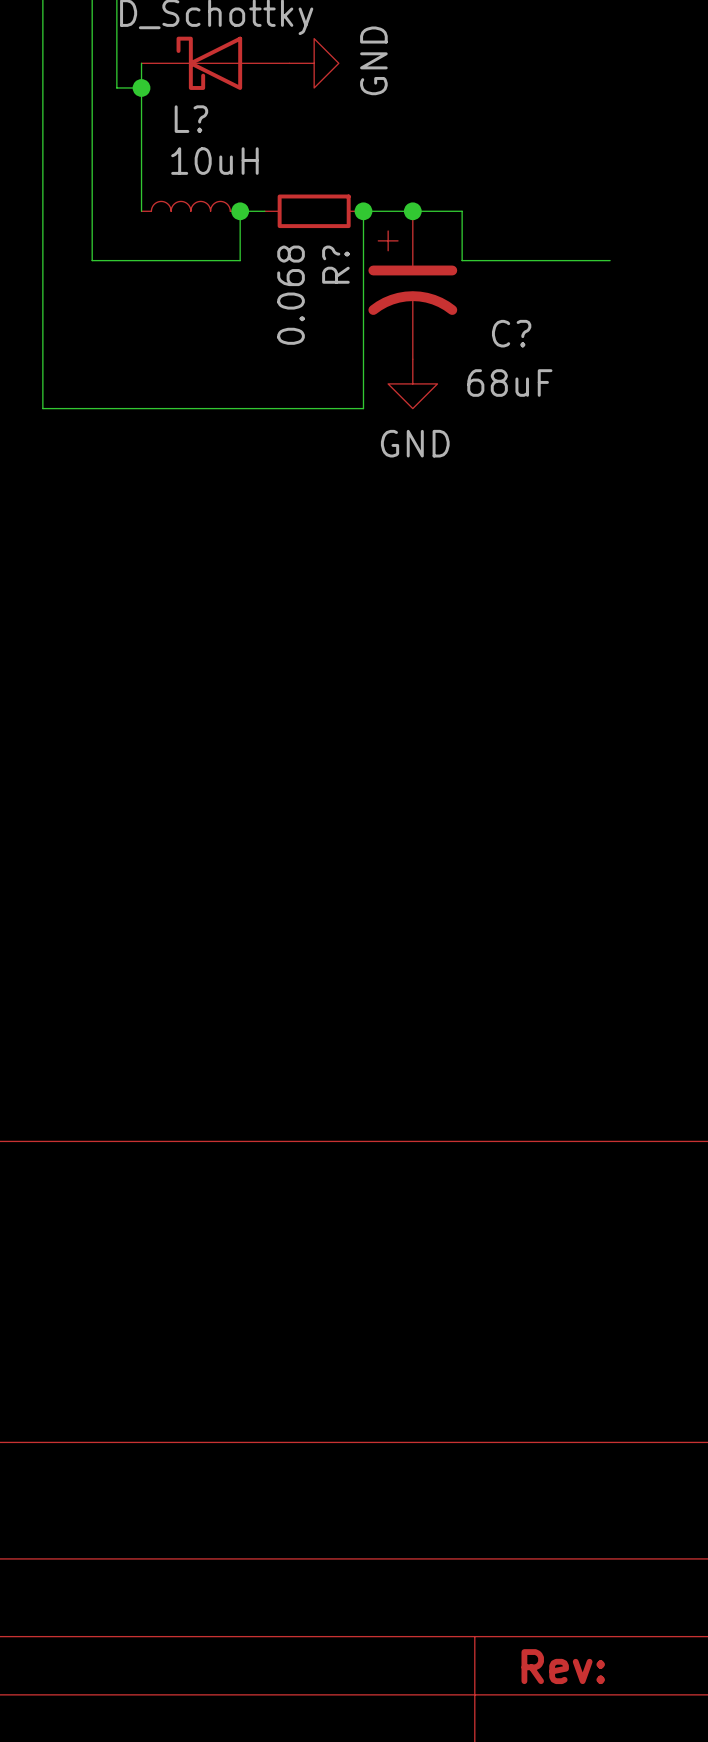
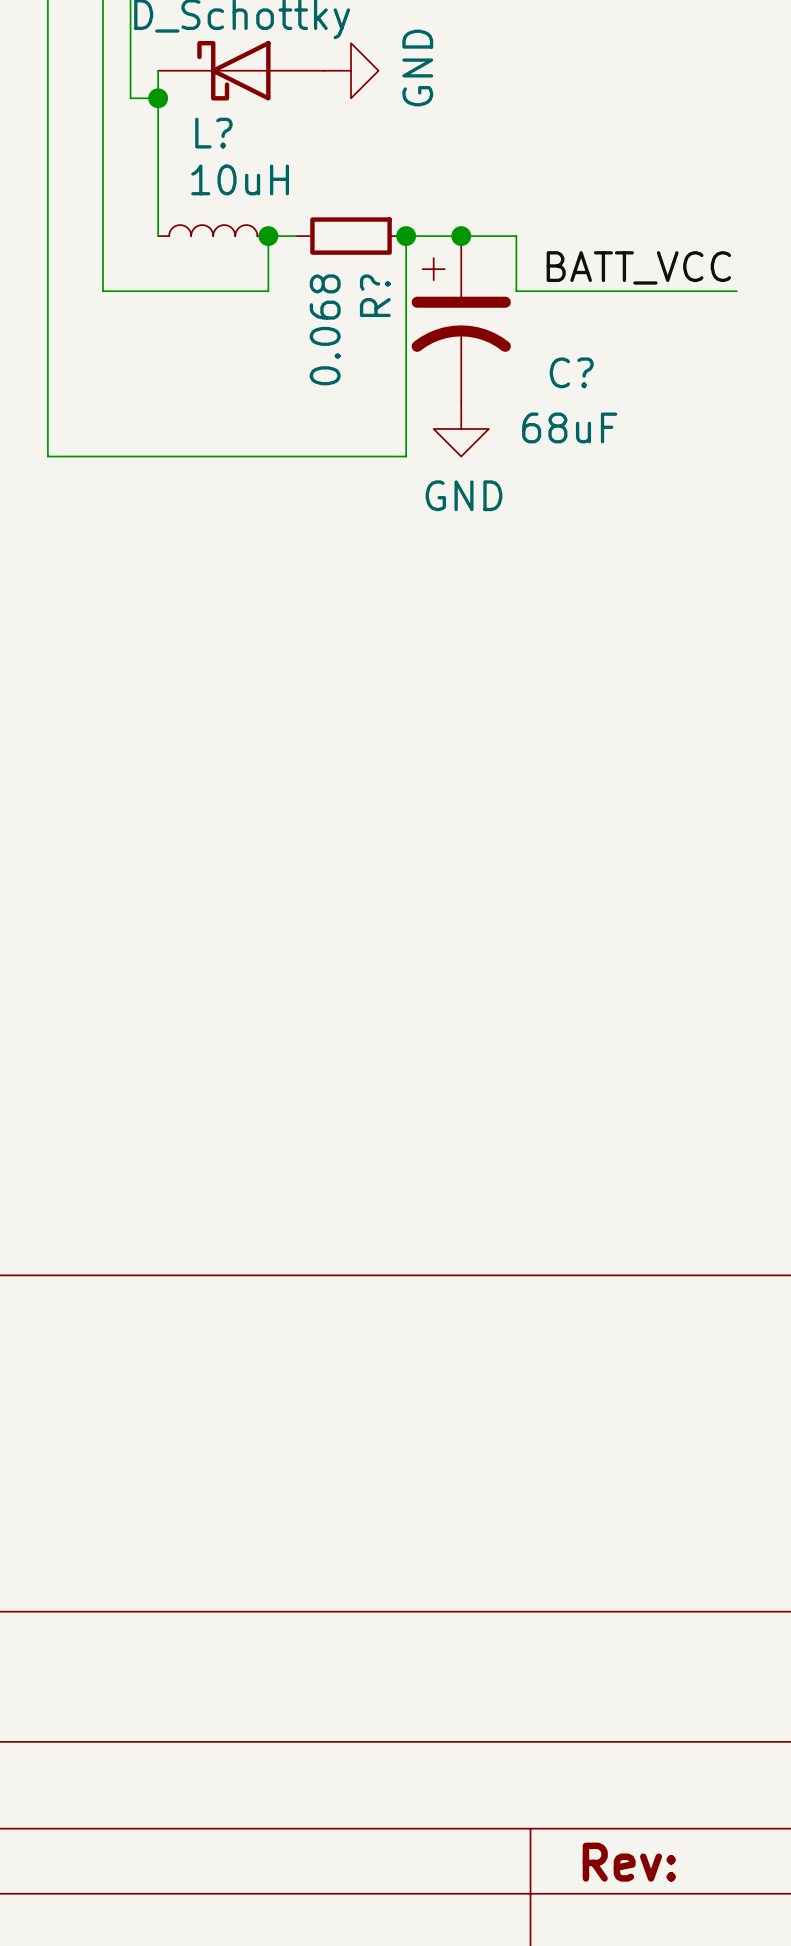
label: none -> BATT_VCC (638, 267)
wire: none -> (681, 291) (736, 291)

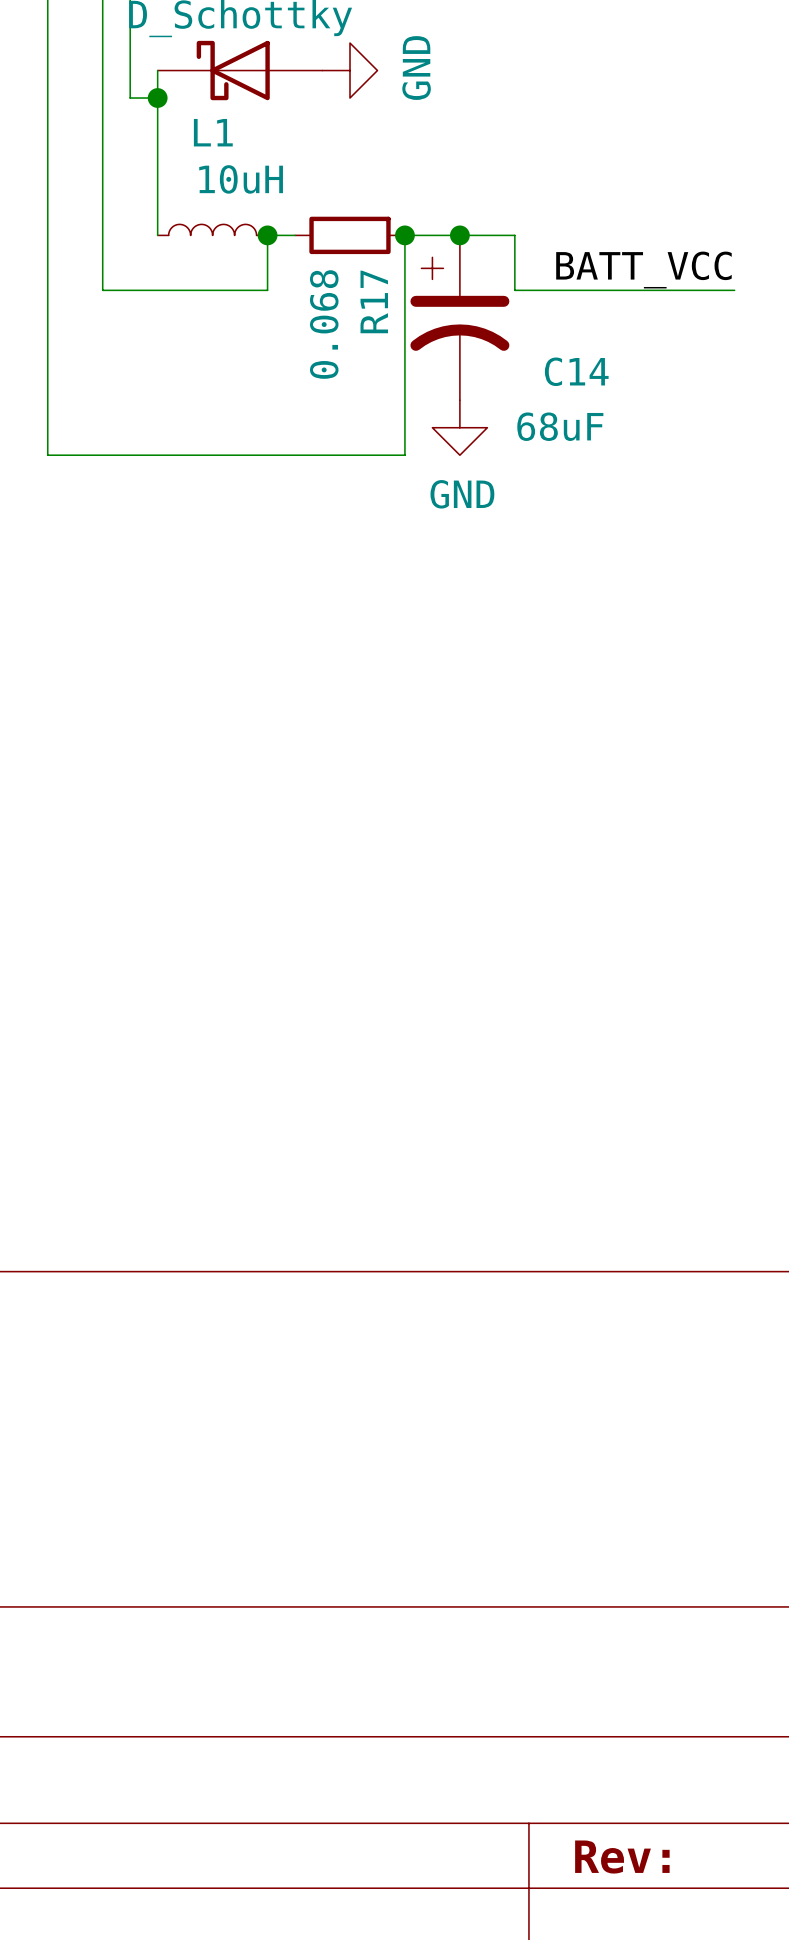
L? name: L? (213, 133) -> L1 (213, 132)
R? name: R? (375, 295) -> R17 (374, 301)
C? name: C? (571, 372) -> C14 (576, 371)

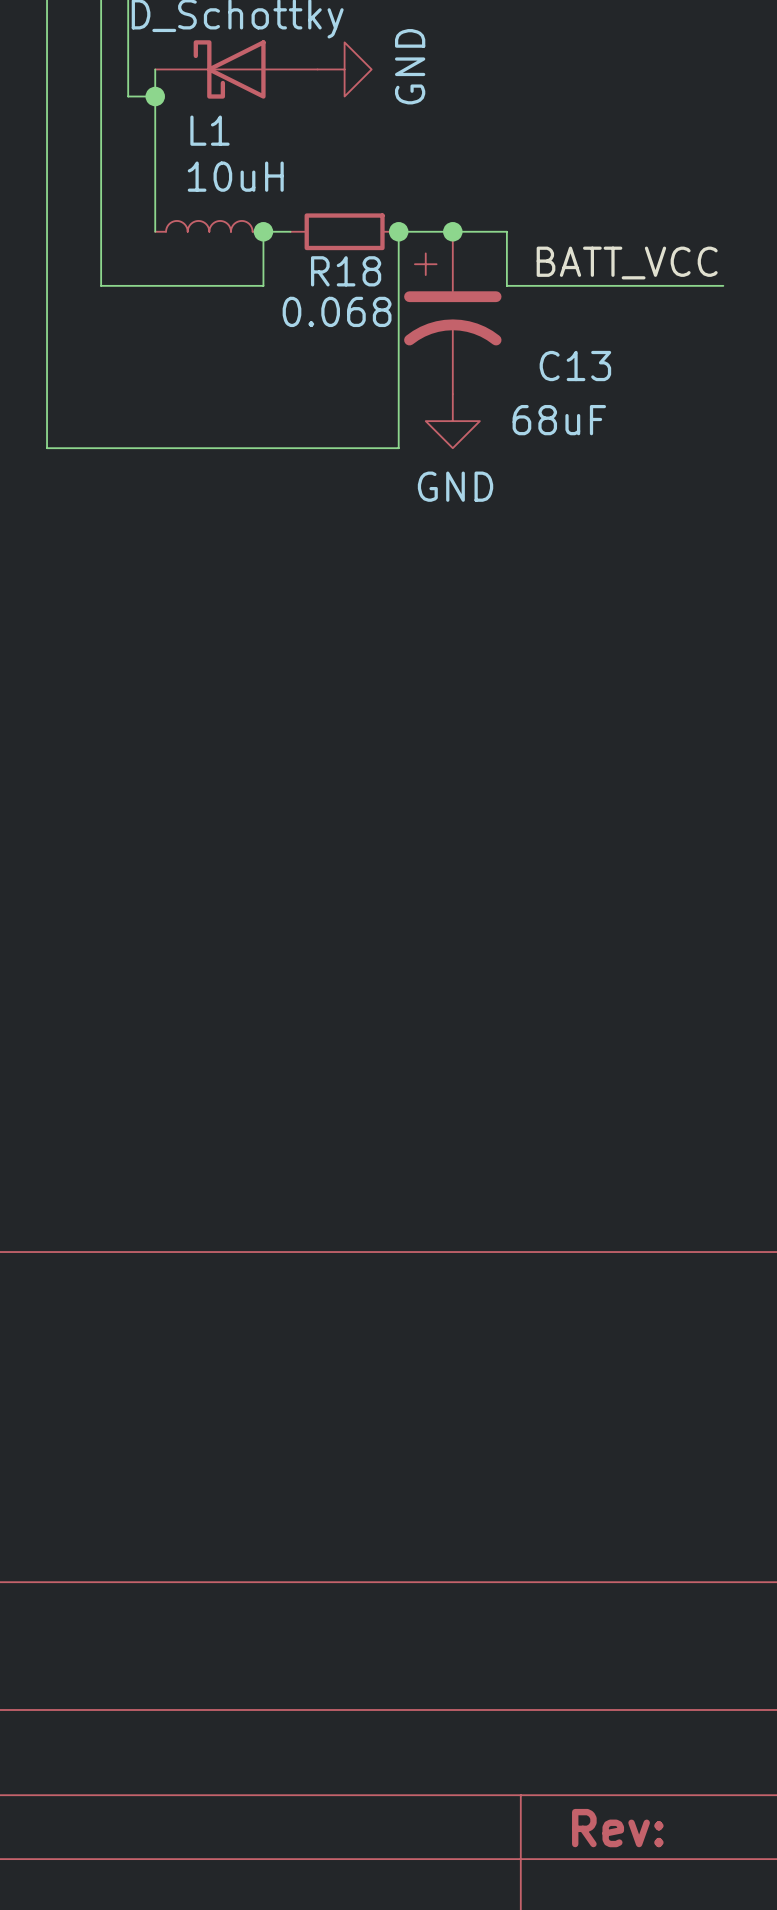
R17 name: R17 (374, 301) -> R18 (346, 271)
R17 value rotation: 0° (324, 324) -> 90° clockwise (337, 311)
C14 name: C14 (576, 371) -> C13 (575, 366)

